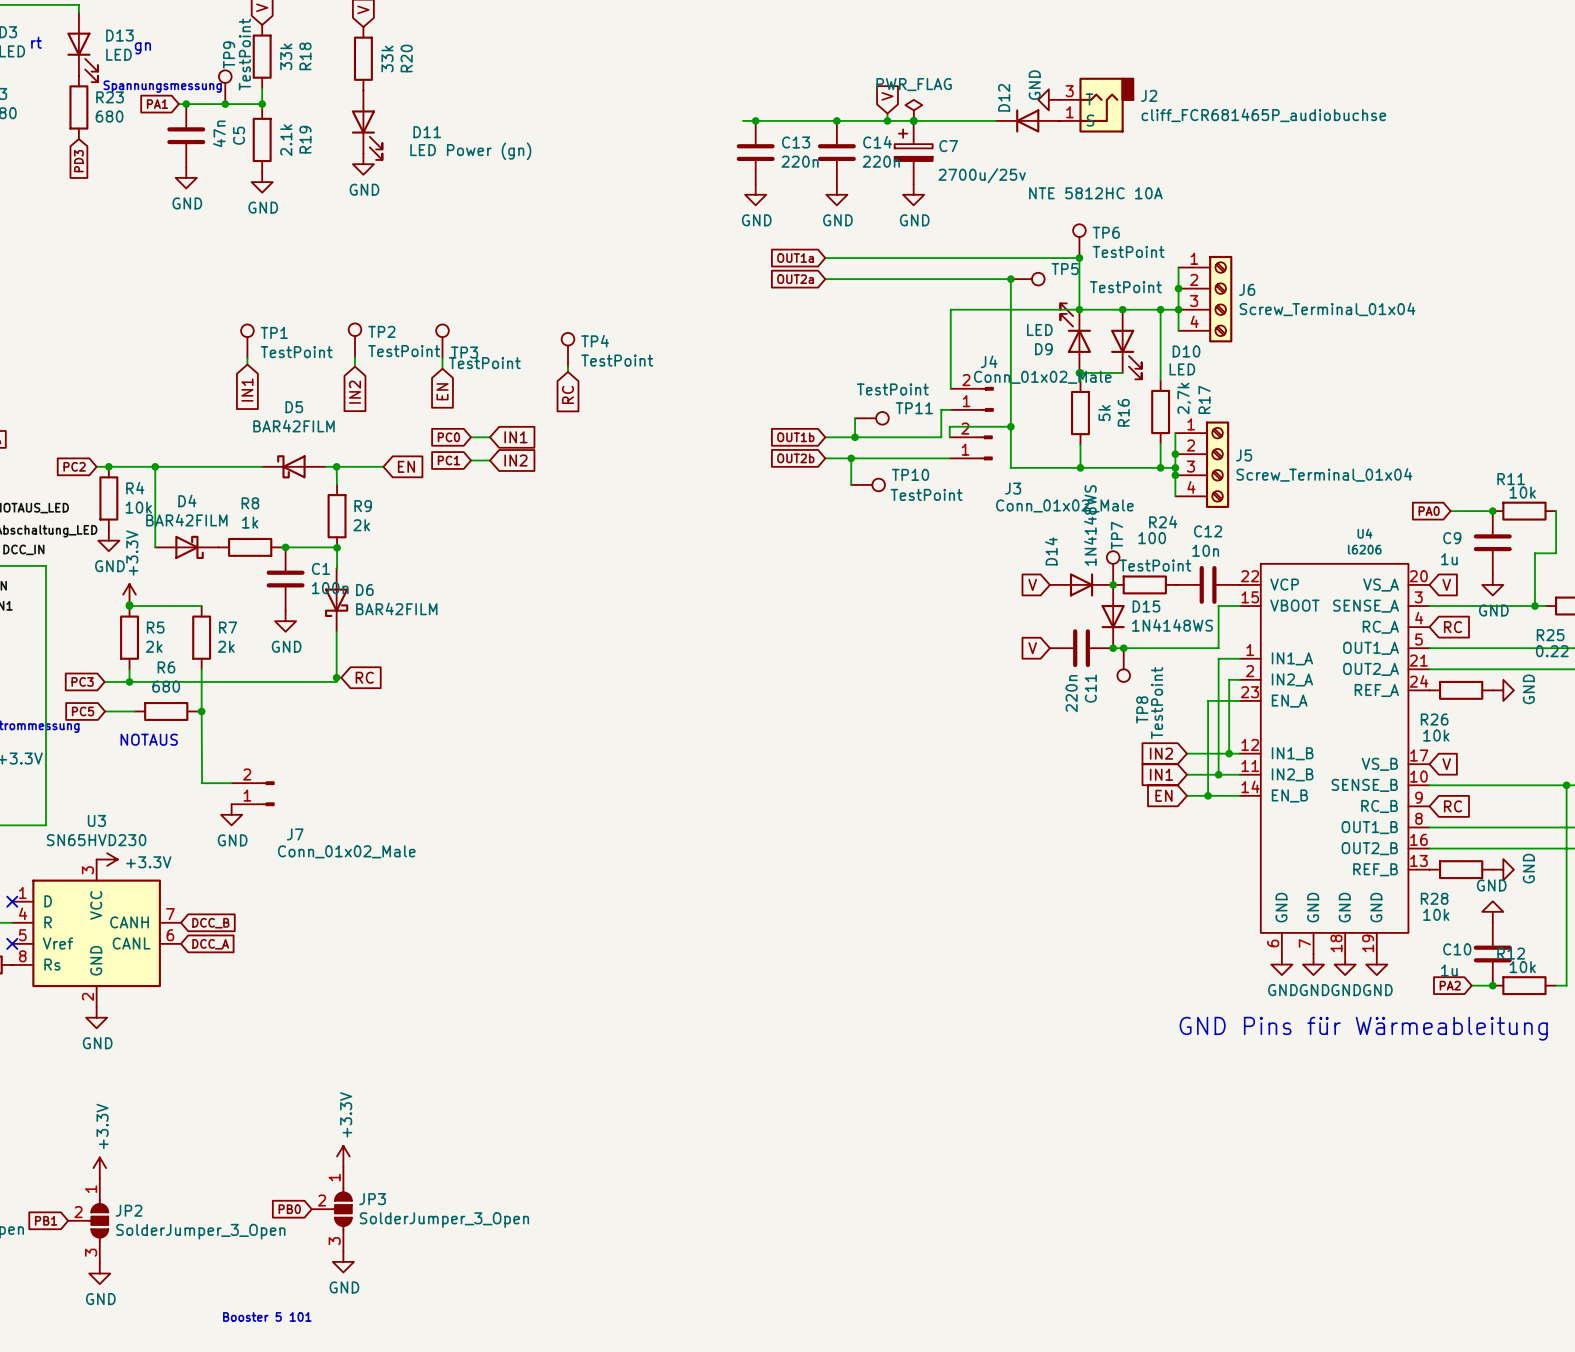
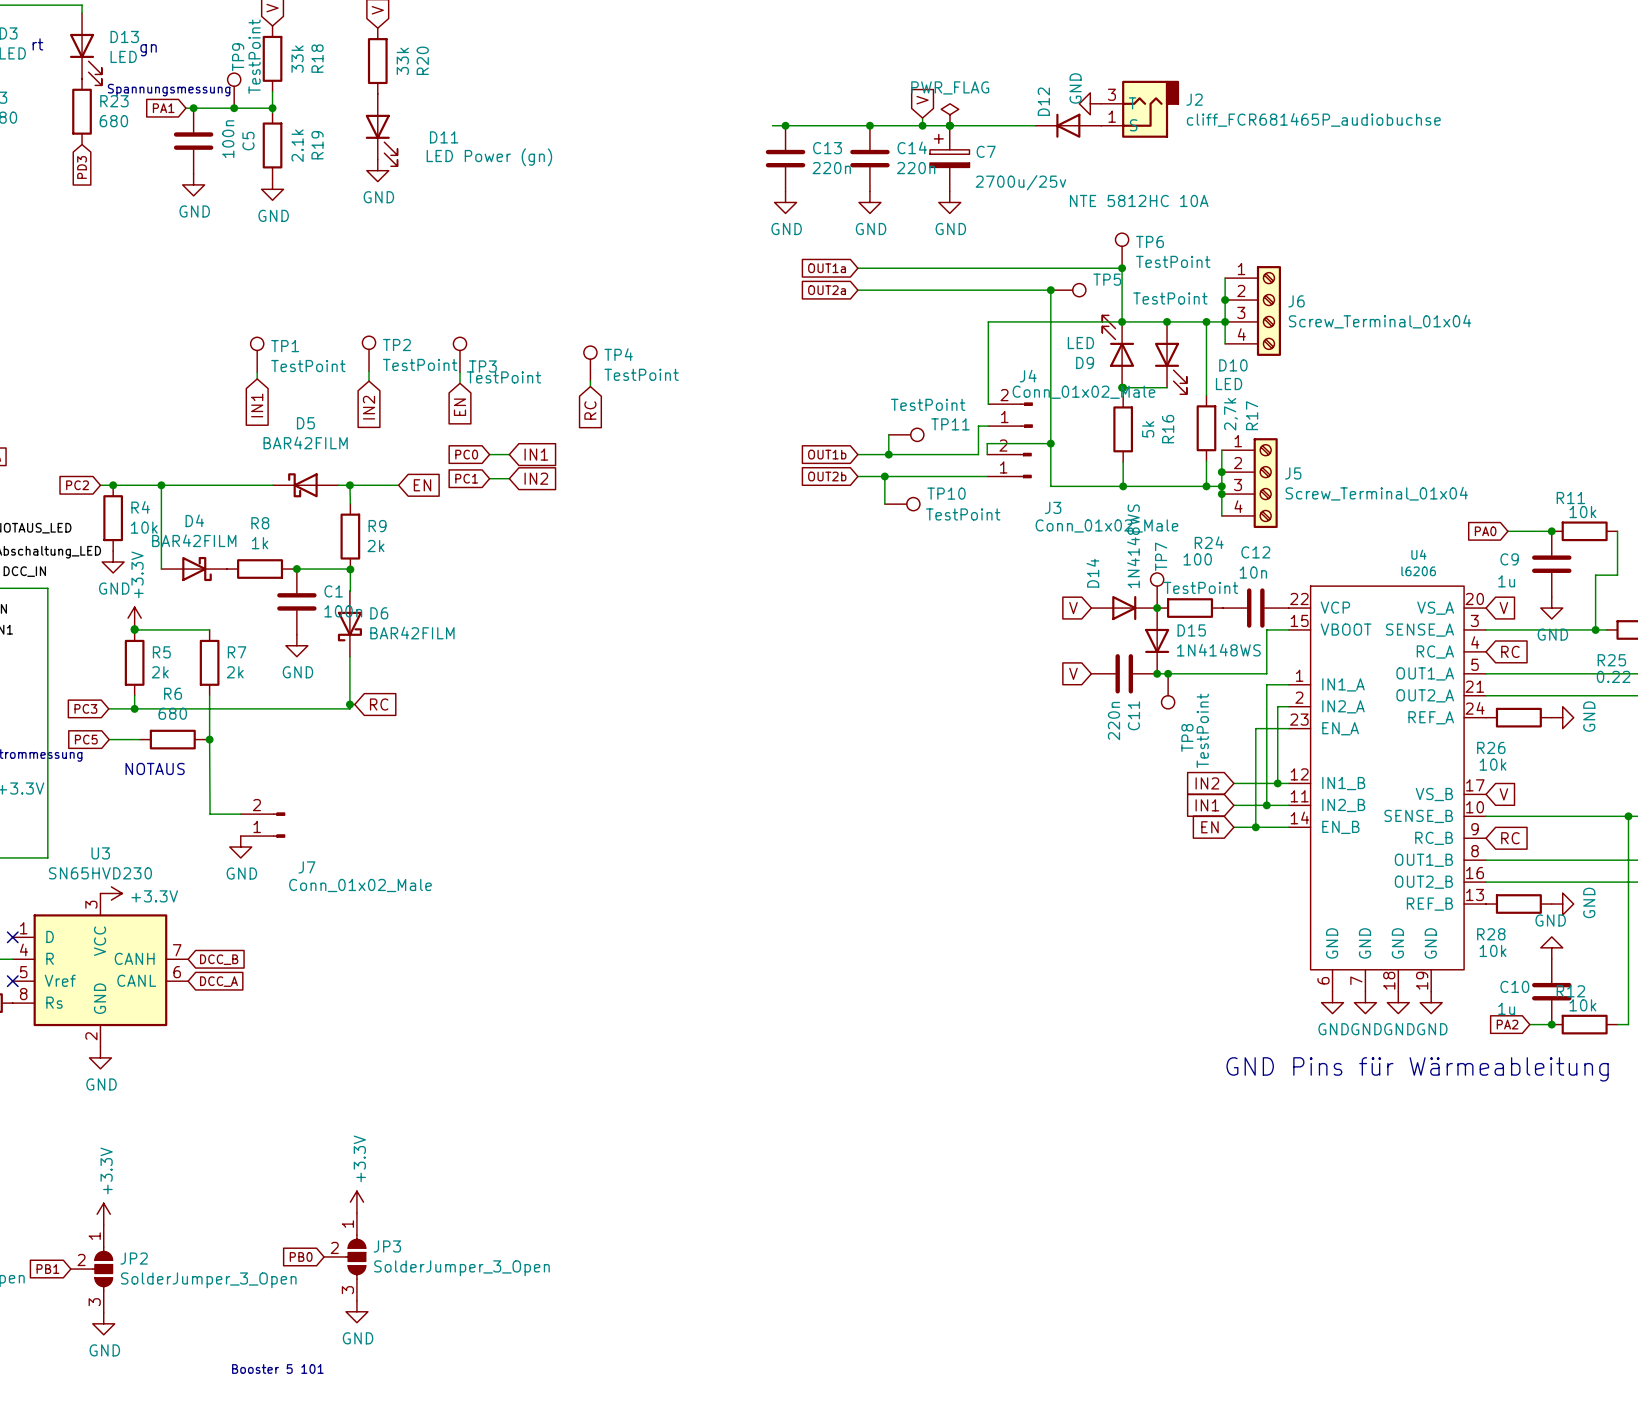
C5 value: 47n (219, 133) -> 100n (228, 139)

